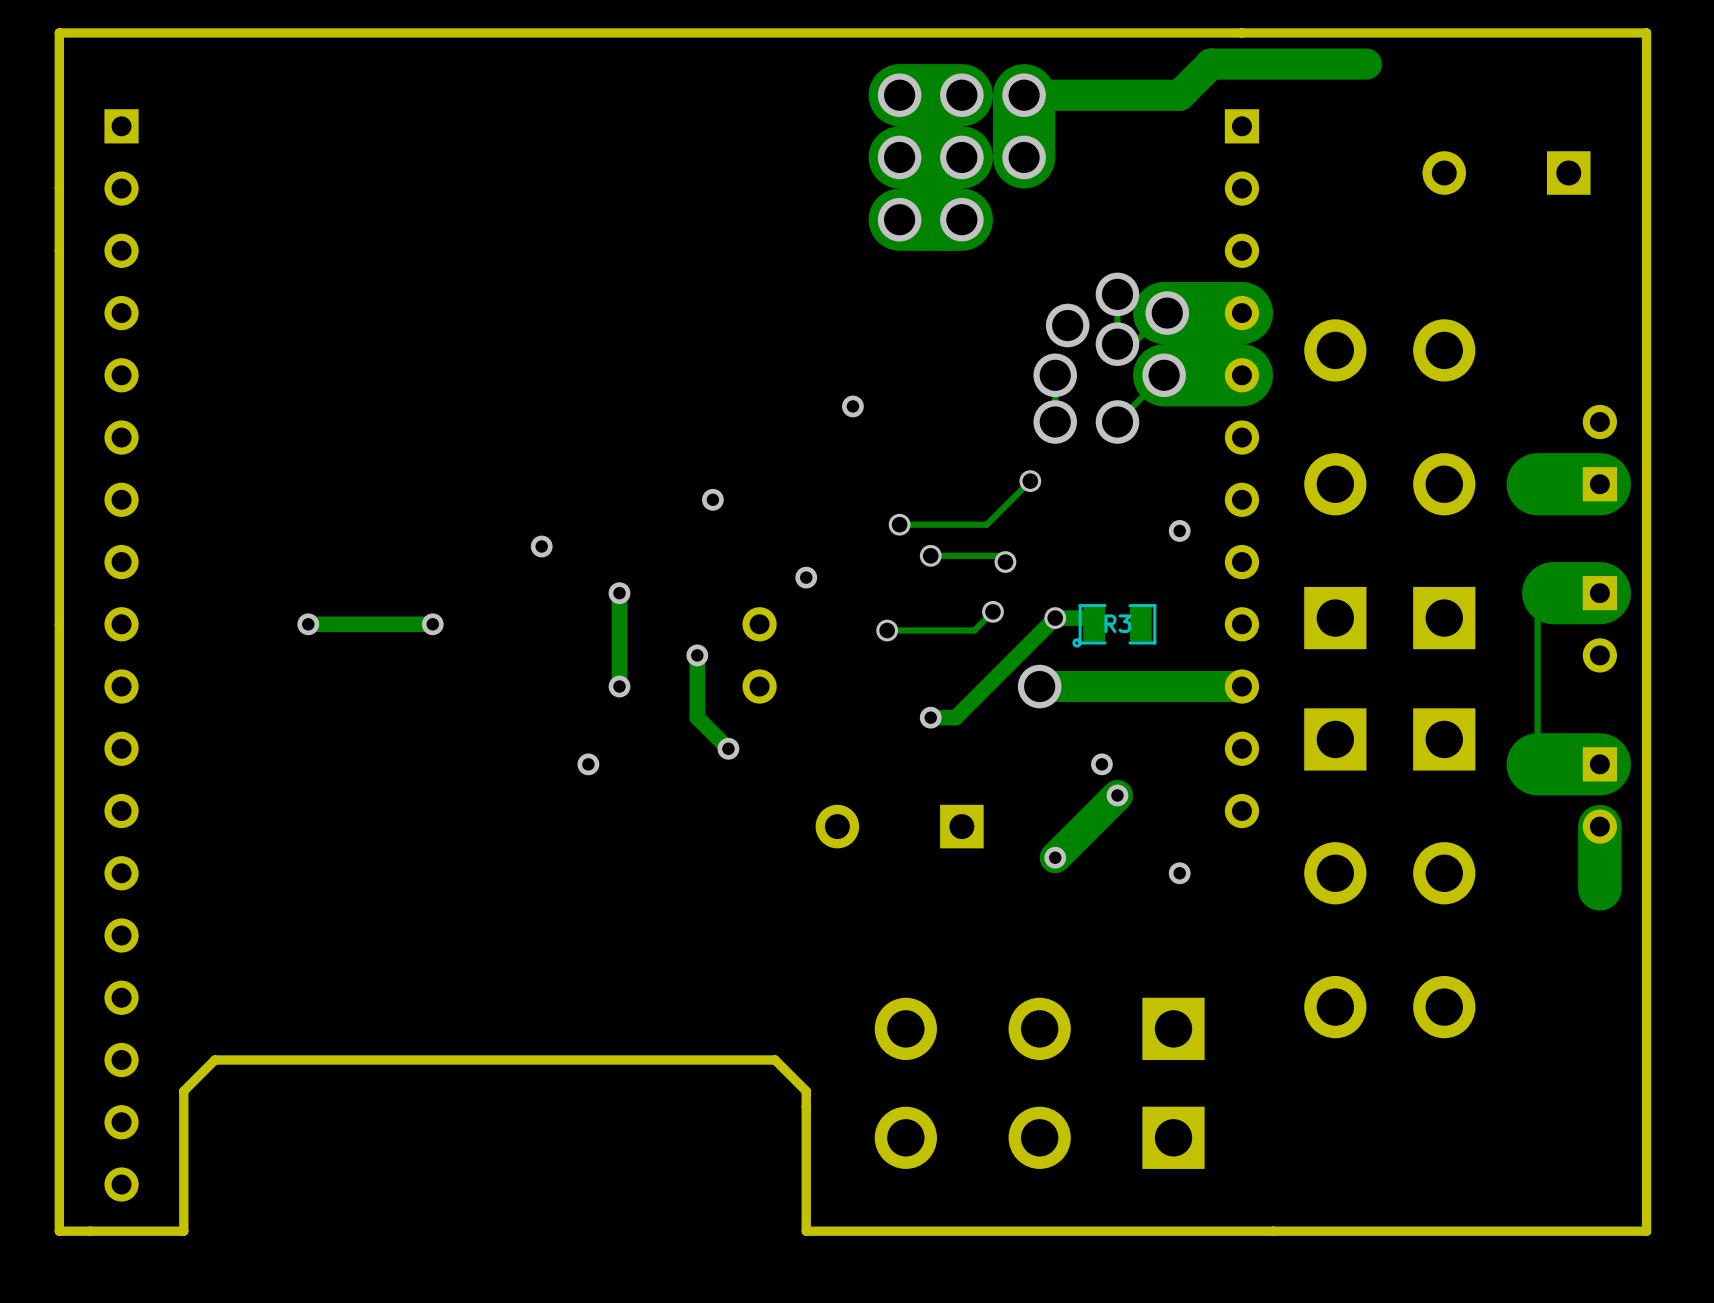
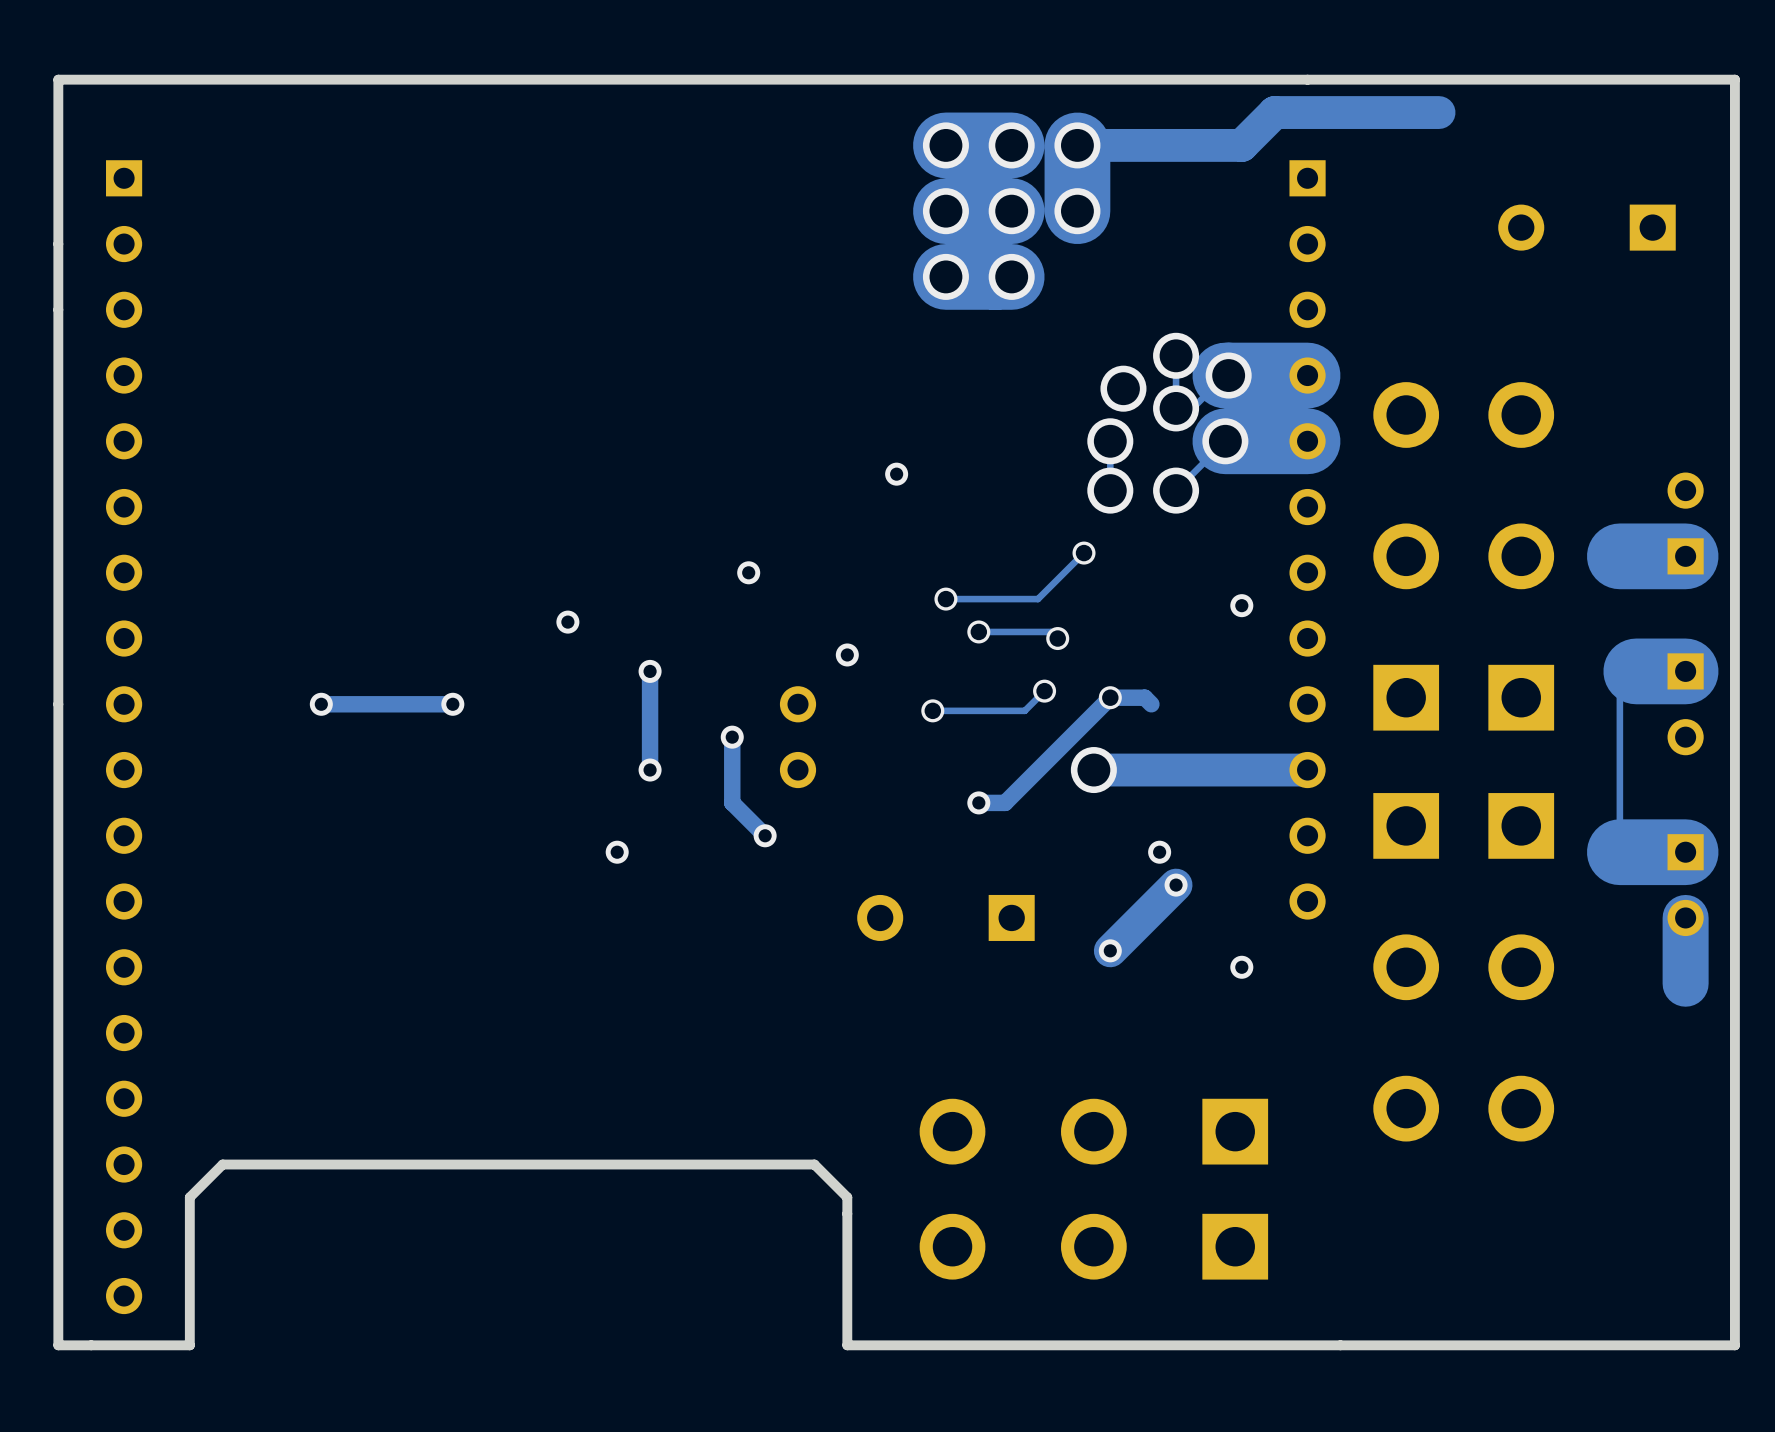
R3: (1114, 625) -> none

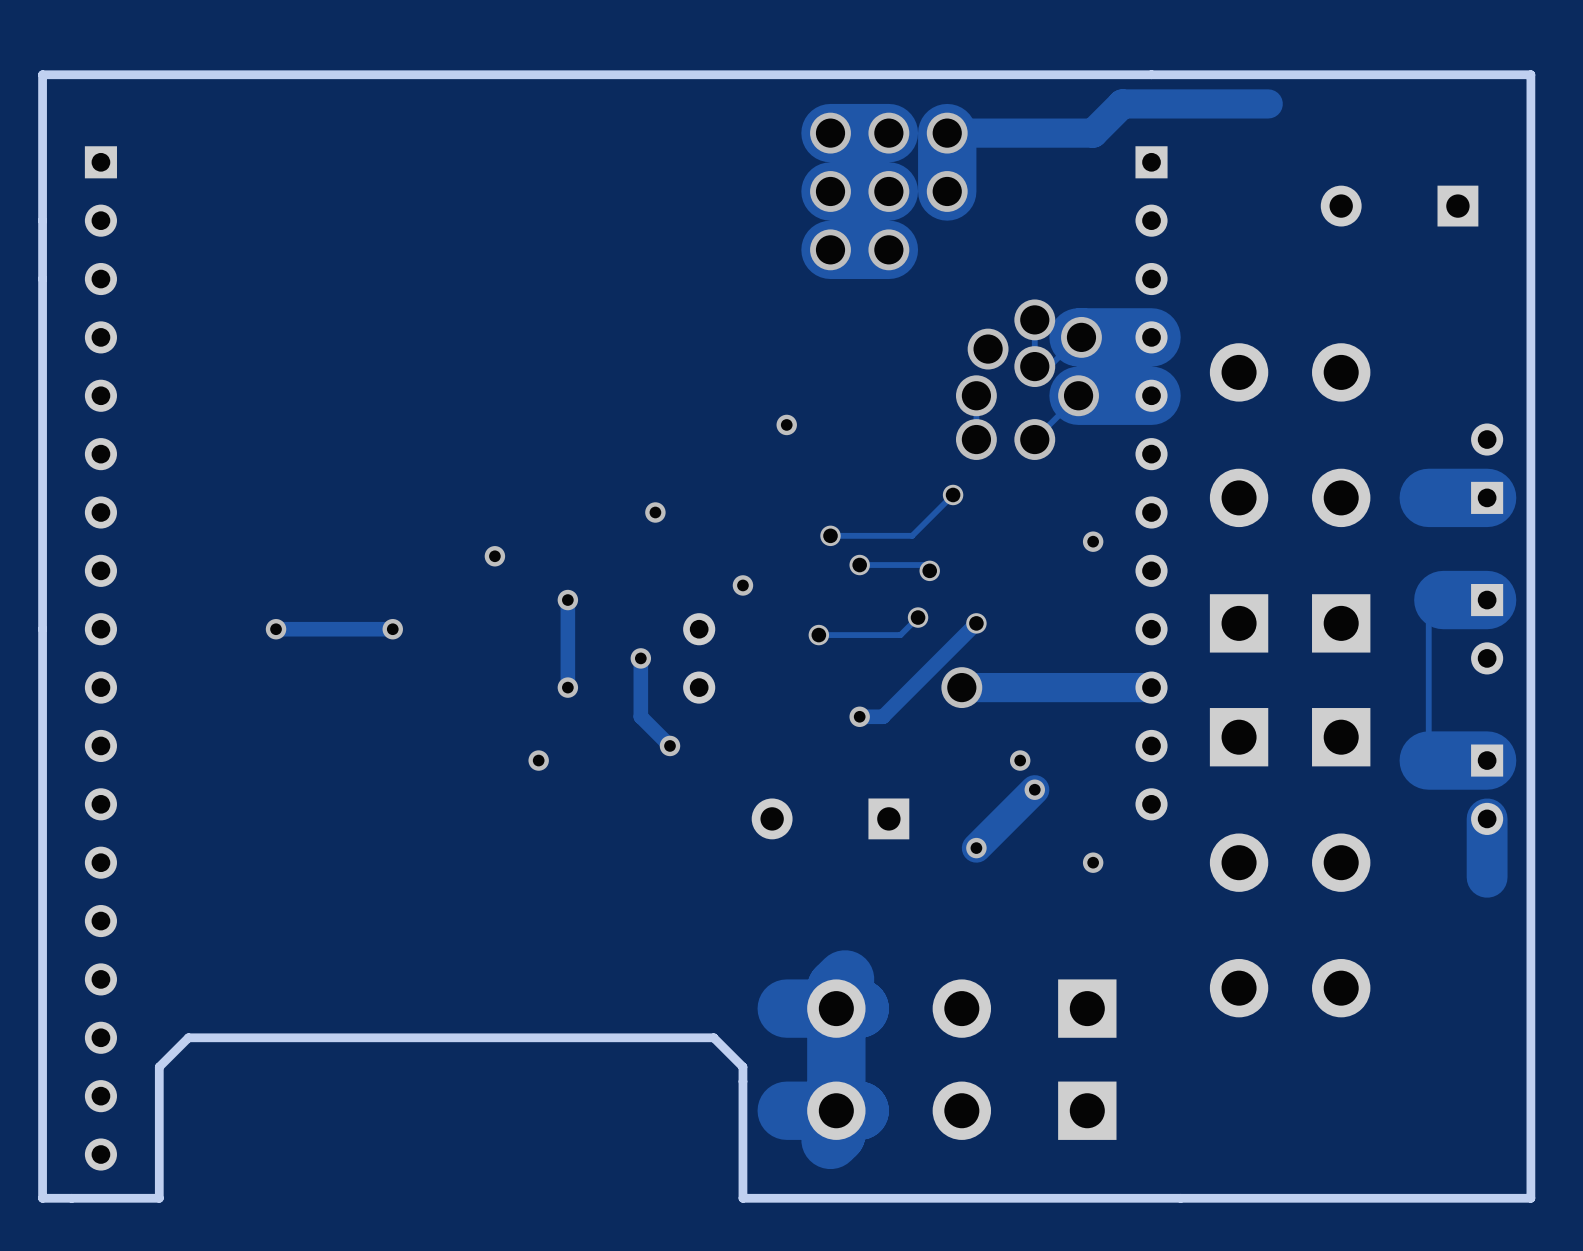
track: (1110, 697) (1144, 697) (1151, 704) -> none
track: none -> (845, 979) (836, 988) (836, 1134) (830, 1139)
track: none -> (859, 1008) (786, 1008)
track: none -> (859, 1110) (786, 1110)

